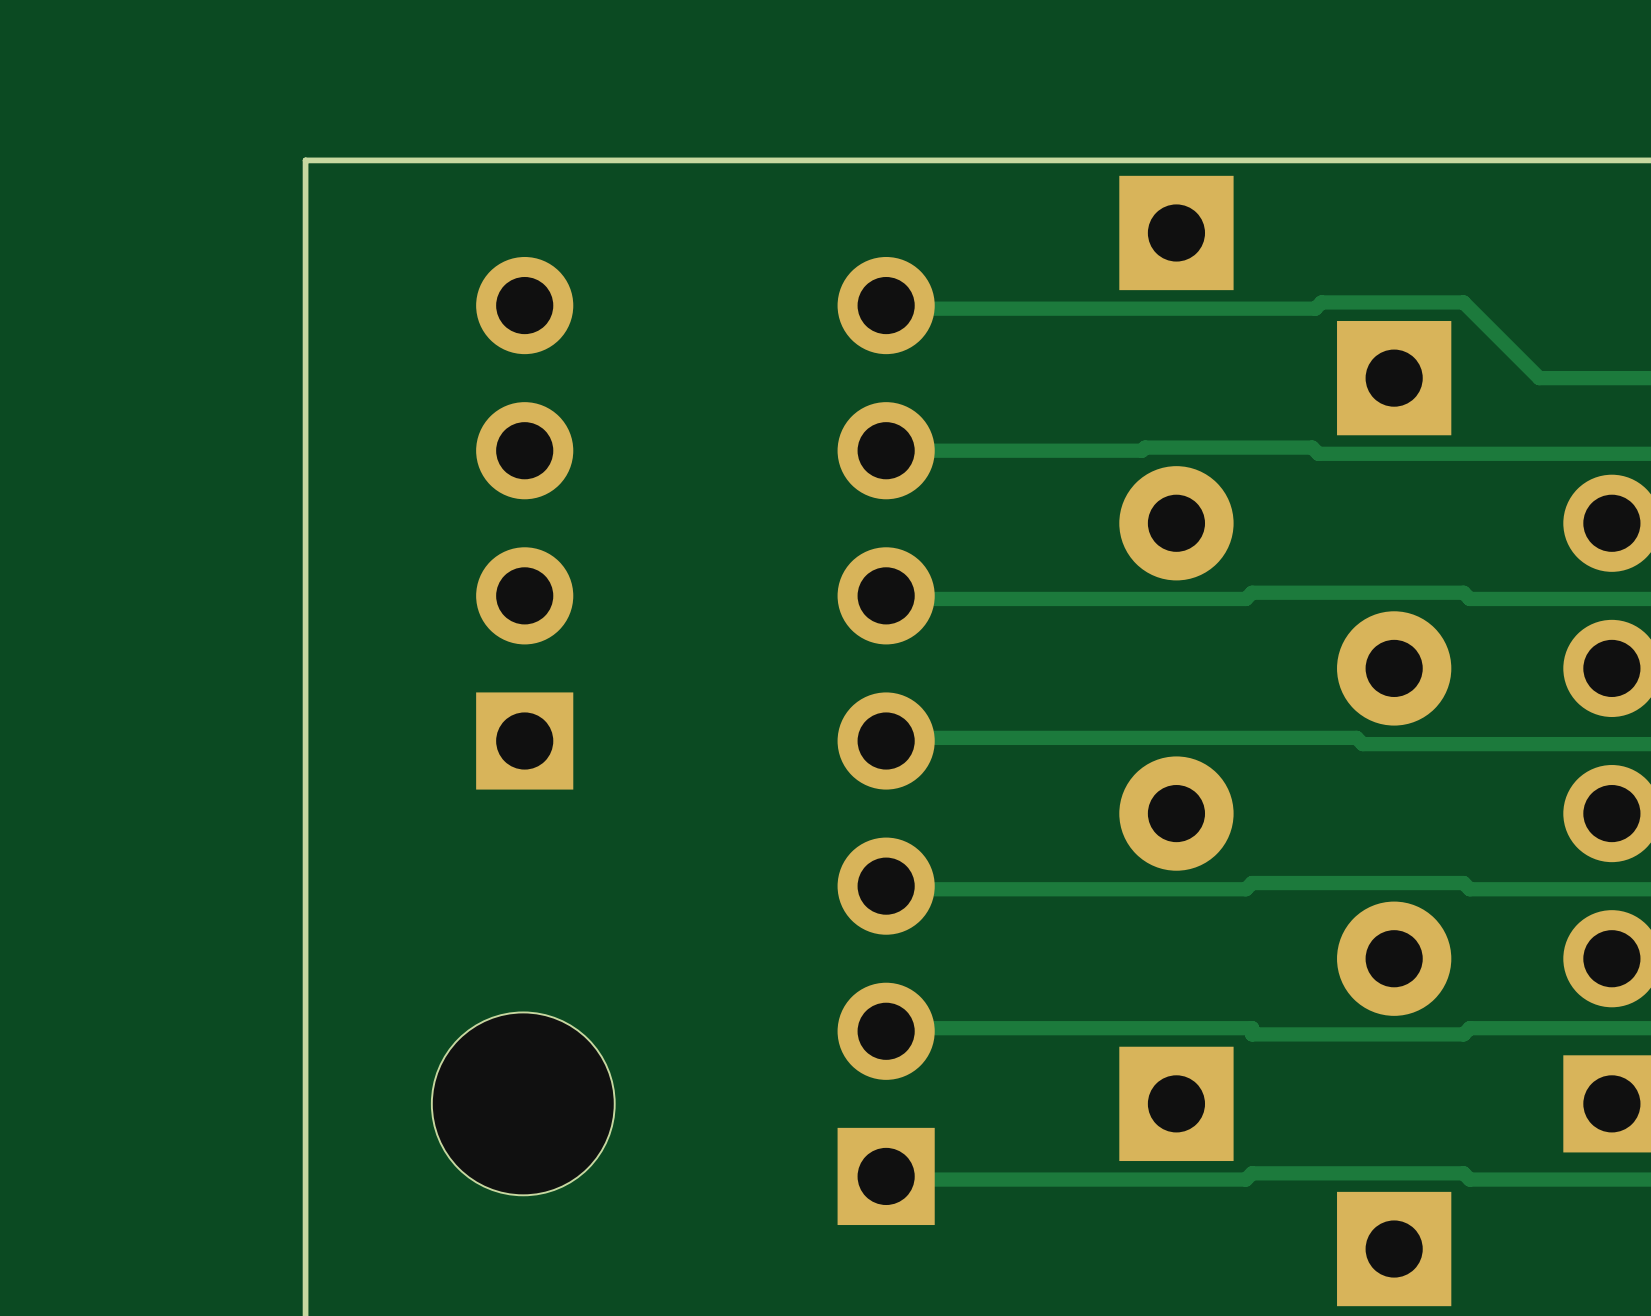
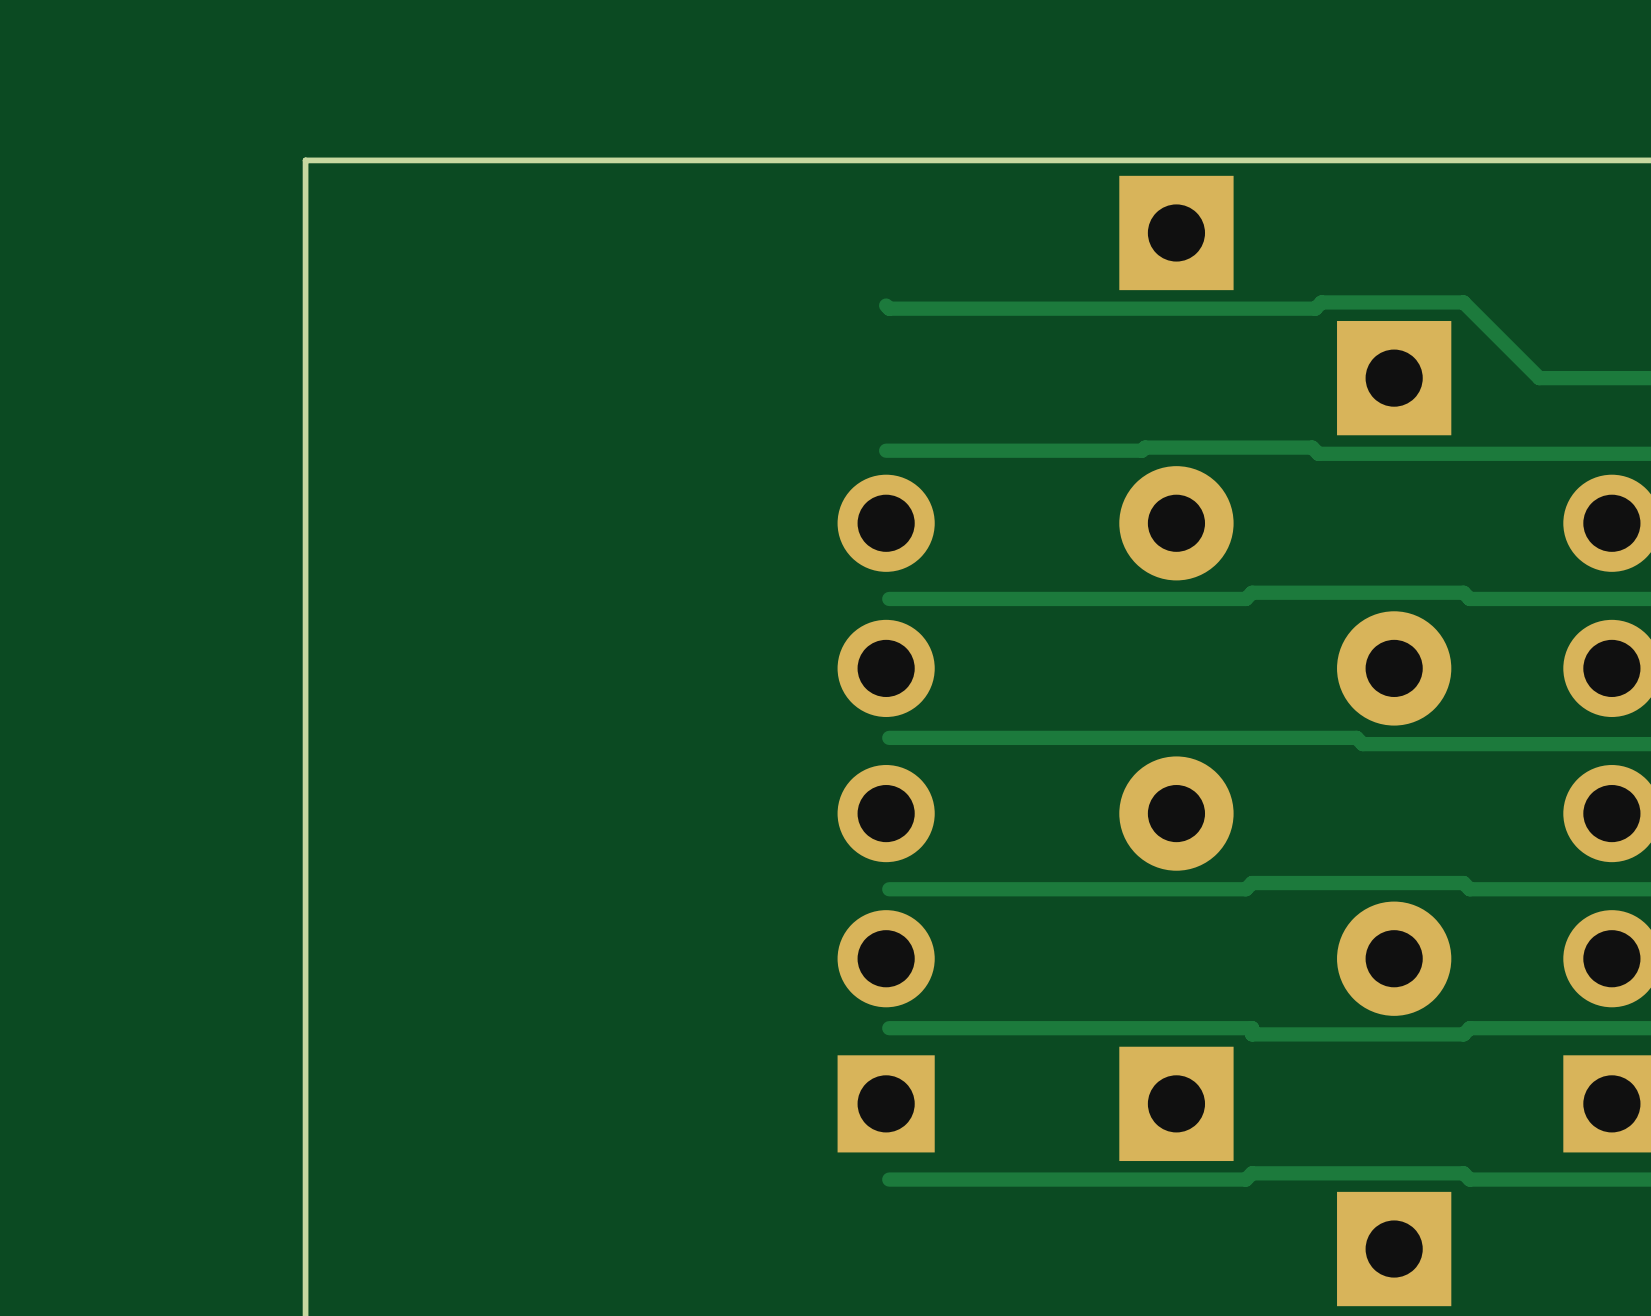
part: (524, 523) -> none
part: (886, 741) -> none
part: none -> (886, 813)
part: (523, 1103) -> none

